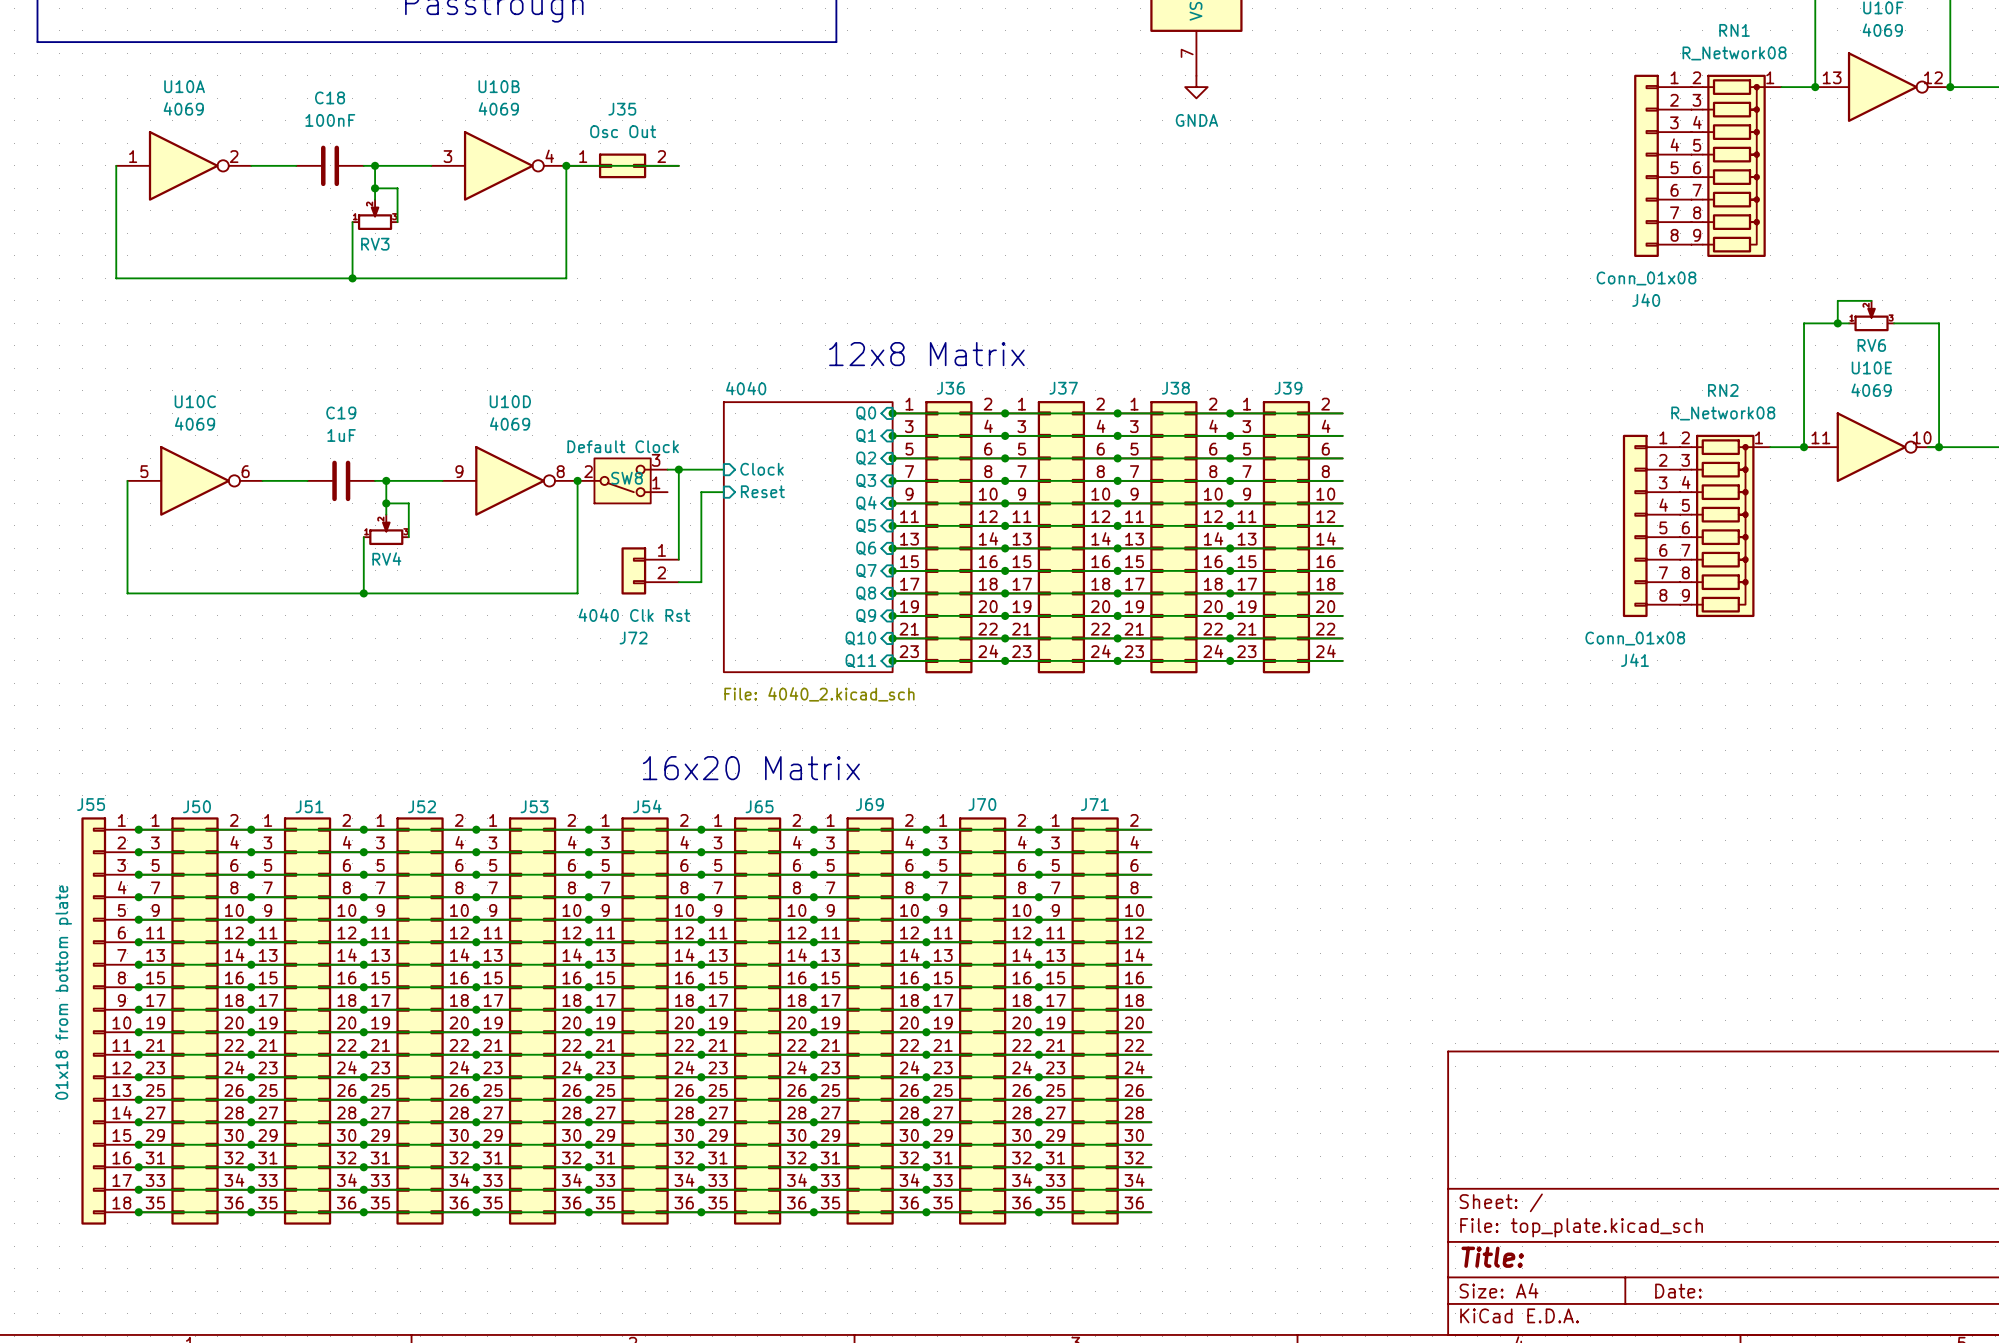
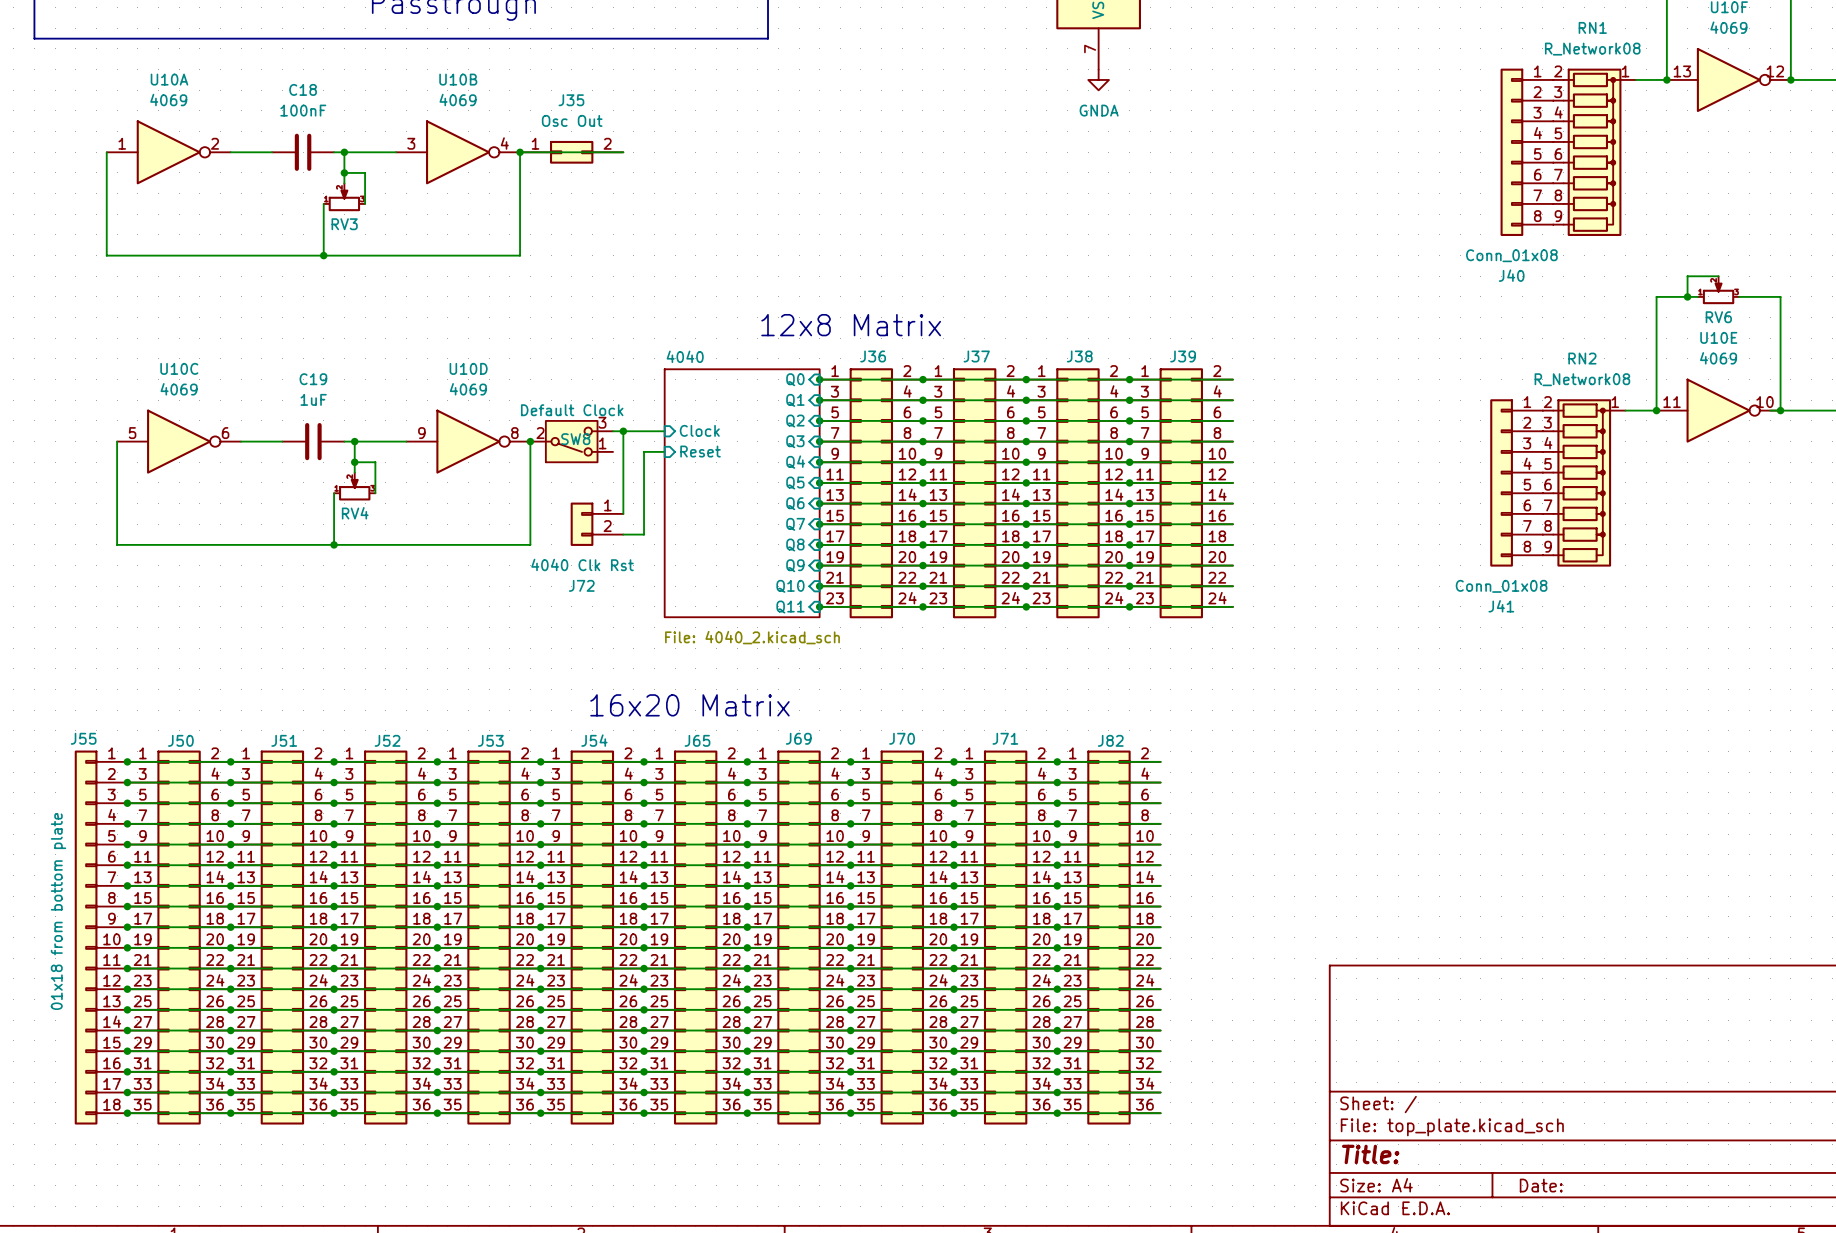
wire: none -> (1057, 761) (1160, 761)
junction: none -> (1057, 761)
wire: none -> (1057, 782) (1160, 782)
junction: none -> (1057, 782)
wire: none -> (1057, 803) (1160, 803)
junction: none -> (1057, 803)
wire: none -> (1057, 823) (1160, 823)
junction: none -> (1057, 823)
wire: none -> (1057, 844) (1160, 844)
junction: none -> (1057, 844)
wire: none -> (1057, 865) (1160, 865)
junction: none -> (1057, 865)
wire: none -> (1057, 885) (1160, 885)
junction: none -> (1057, 885)
wire: none -> (1057, 906) (1160, 906)
junction: none -> (1057, 906)
wire: none -> (1057, 927) (1160, 927)
junction: none -> (1057, 927)
J82: none -> (1108, 937)
wire: none -> (1057, 947) (1160, 947)
junction: none -> (1057, 947)
wire: none -> (1057, 968) (1160, 968)
junction: none -> (1057, 968)
wire: none -> (1057, 989) (1160, 989)
junction: none -> (1057, 989)
wire: none -> (1057, 1009) (1160, 1009)
junction: none -> (1057, 1009)
wire: none -> (1057, 1030) (1160, 1030)
junction: none -> (1057, 1030)
wire: none -> (1057, 1051) (1160, 1051)
junction: none -> (1057, 1051)
wire: none -> (1057, 1071) (1160, 1071)
junction: none -> (1057, 1071)
wire: none -> (1057, 1092) (1160, 1092)
junction: none -> (1057, 1092)
wire: none -> (1057, 1113) (1160, 1113)
junction: none -> (1057, 1113)

